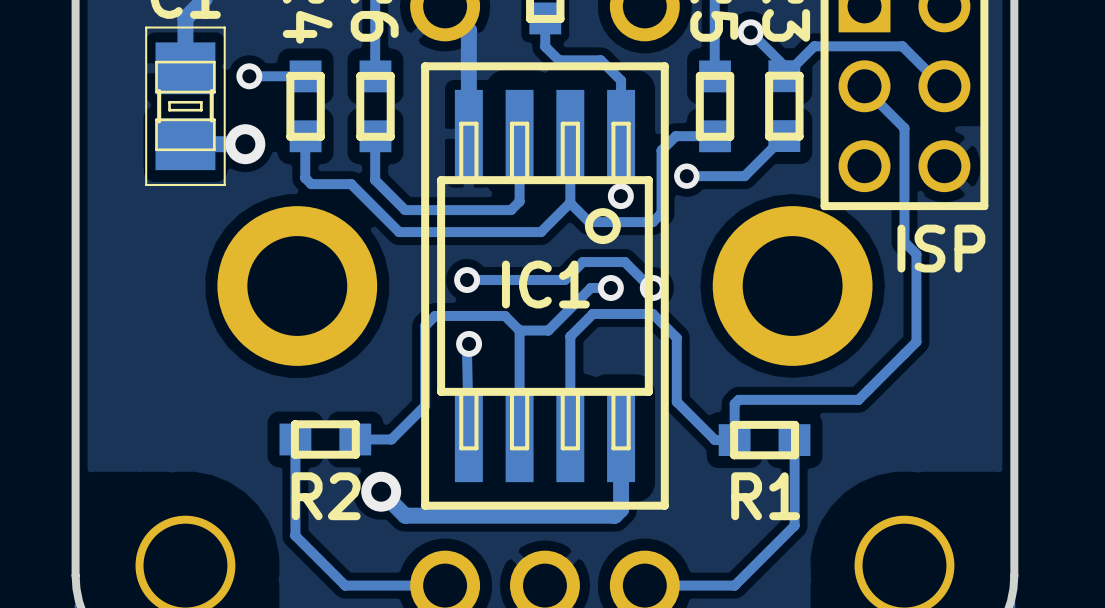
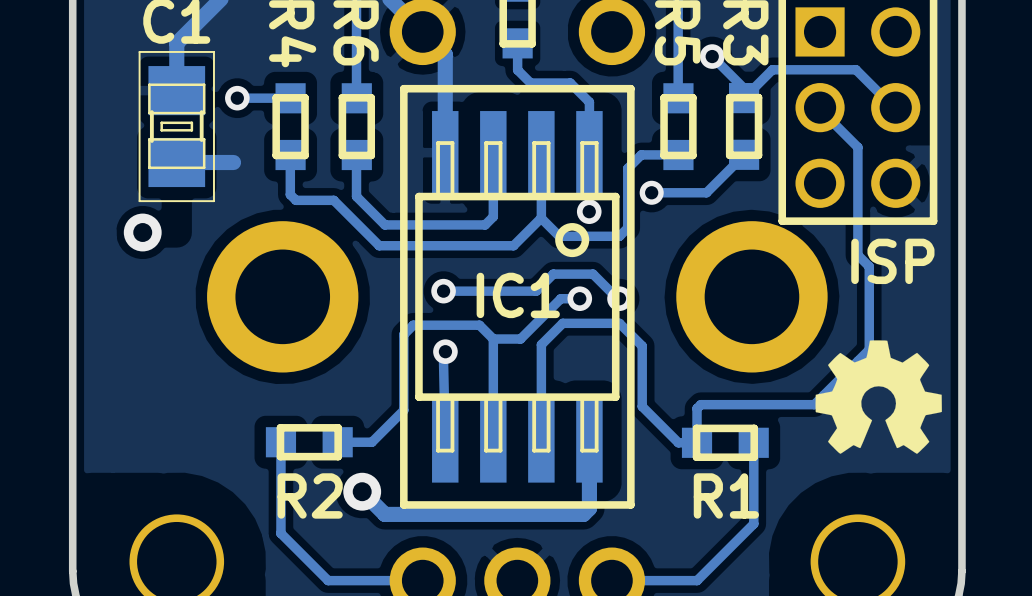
via position: (245, 144) -> (142, 232)
drawing: none -> [815, 340, 942, 454]

